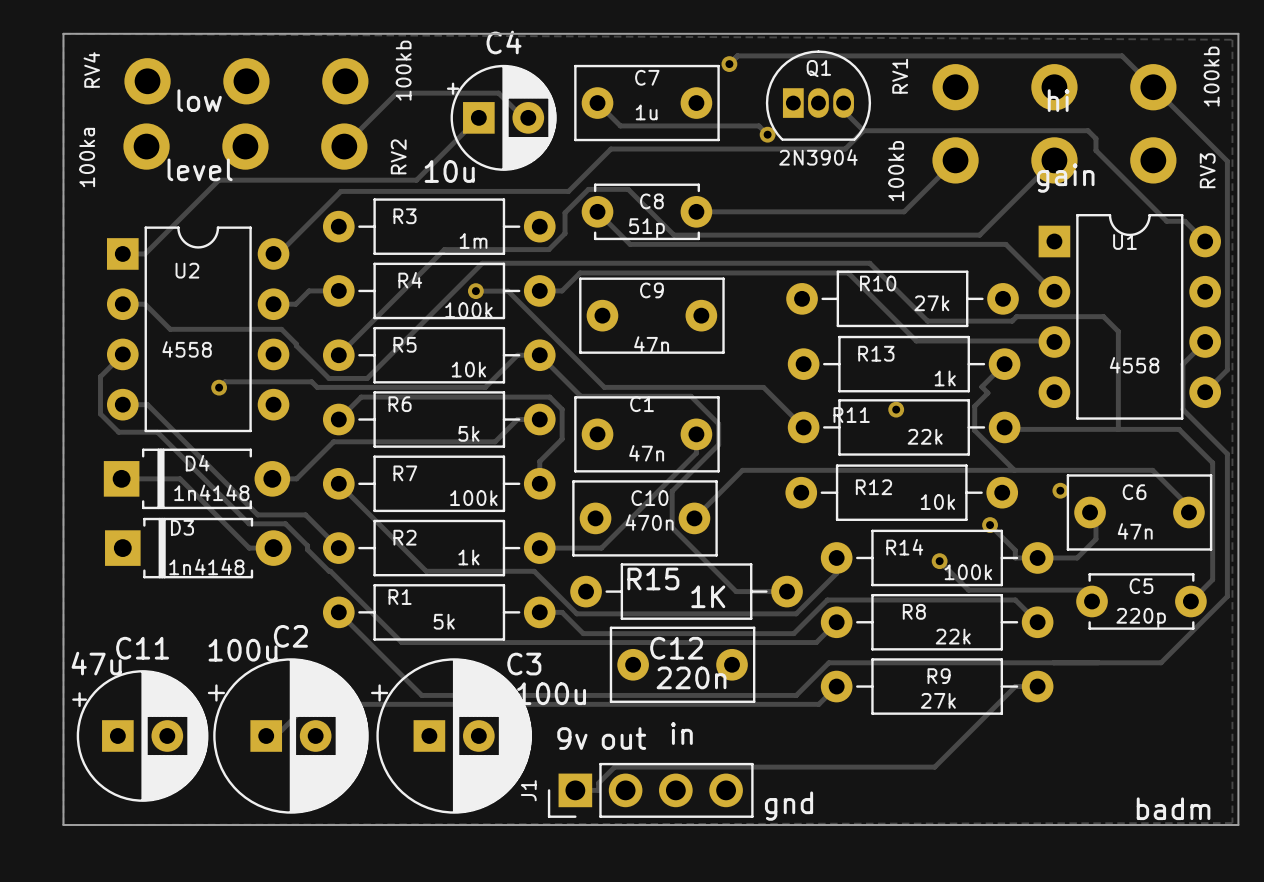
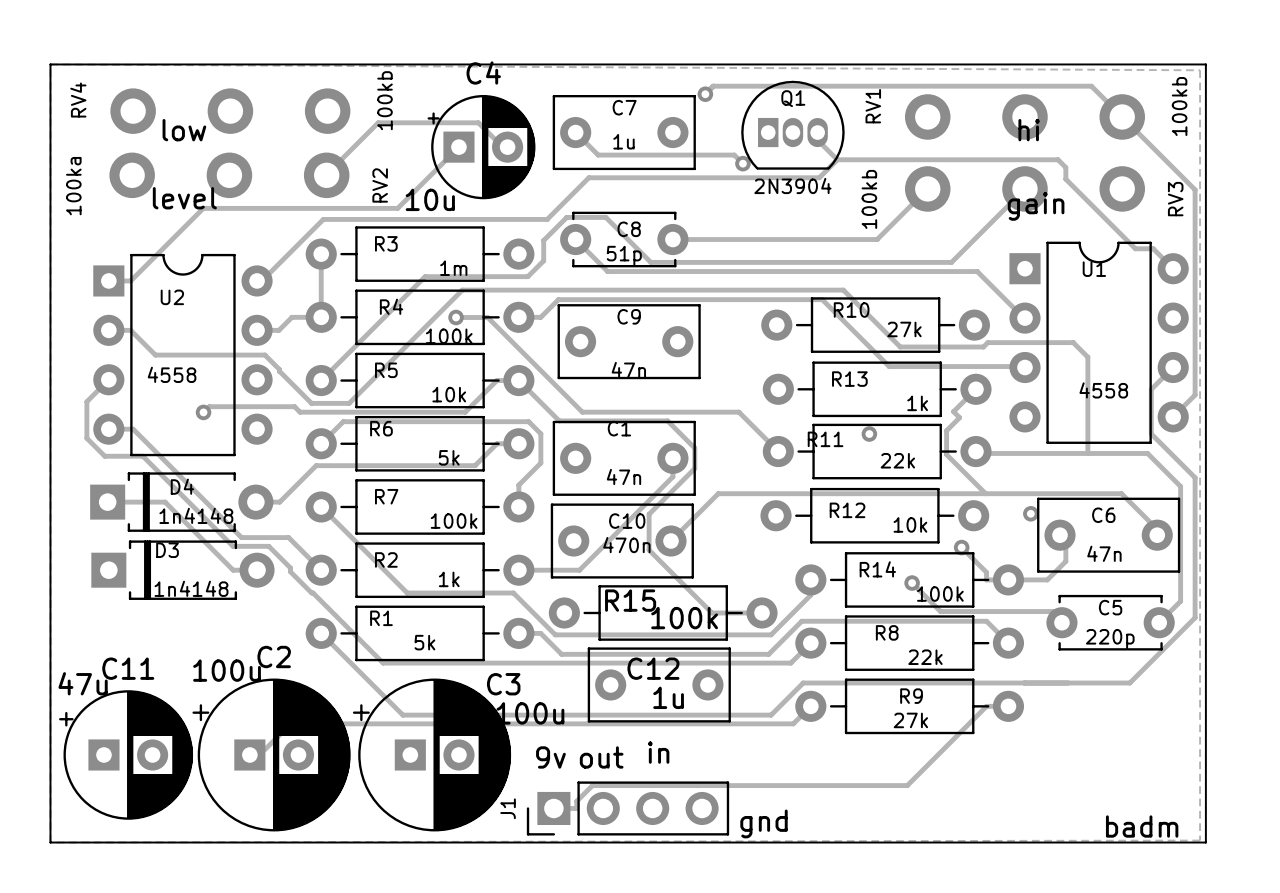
track: none -> (321, 254) (321, 317)
R15 value: 1K (708, 596) -> 100k (684, 618)
C12 value: 220n (691, 677) -> 1u (668, 697)

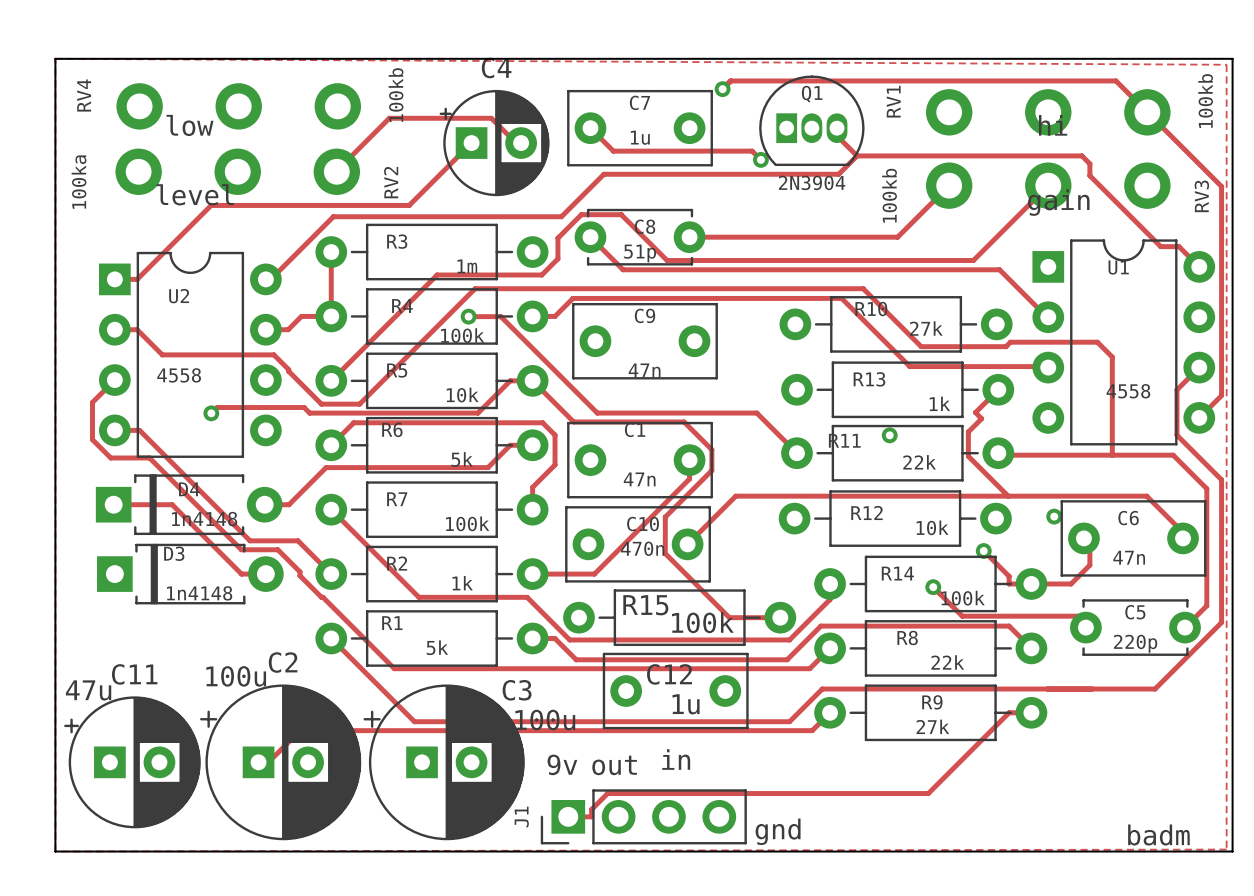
C4 value: 10u (430, 199) -> none

